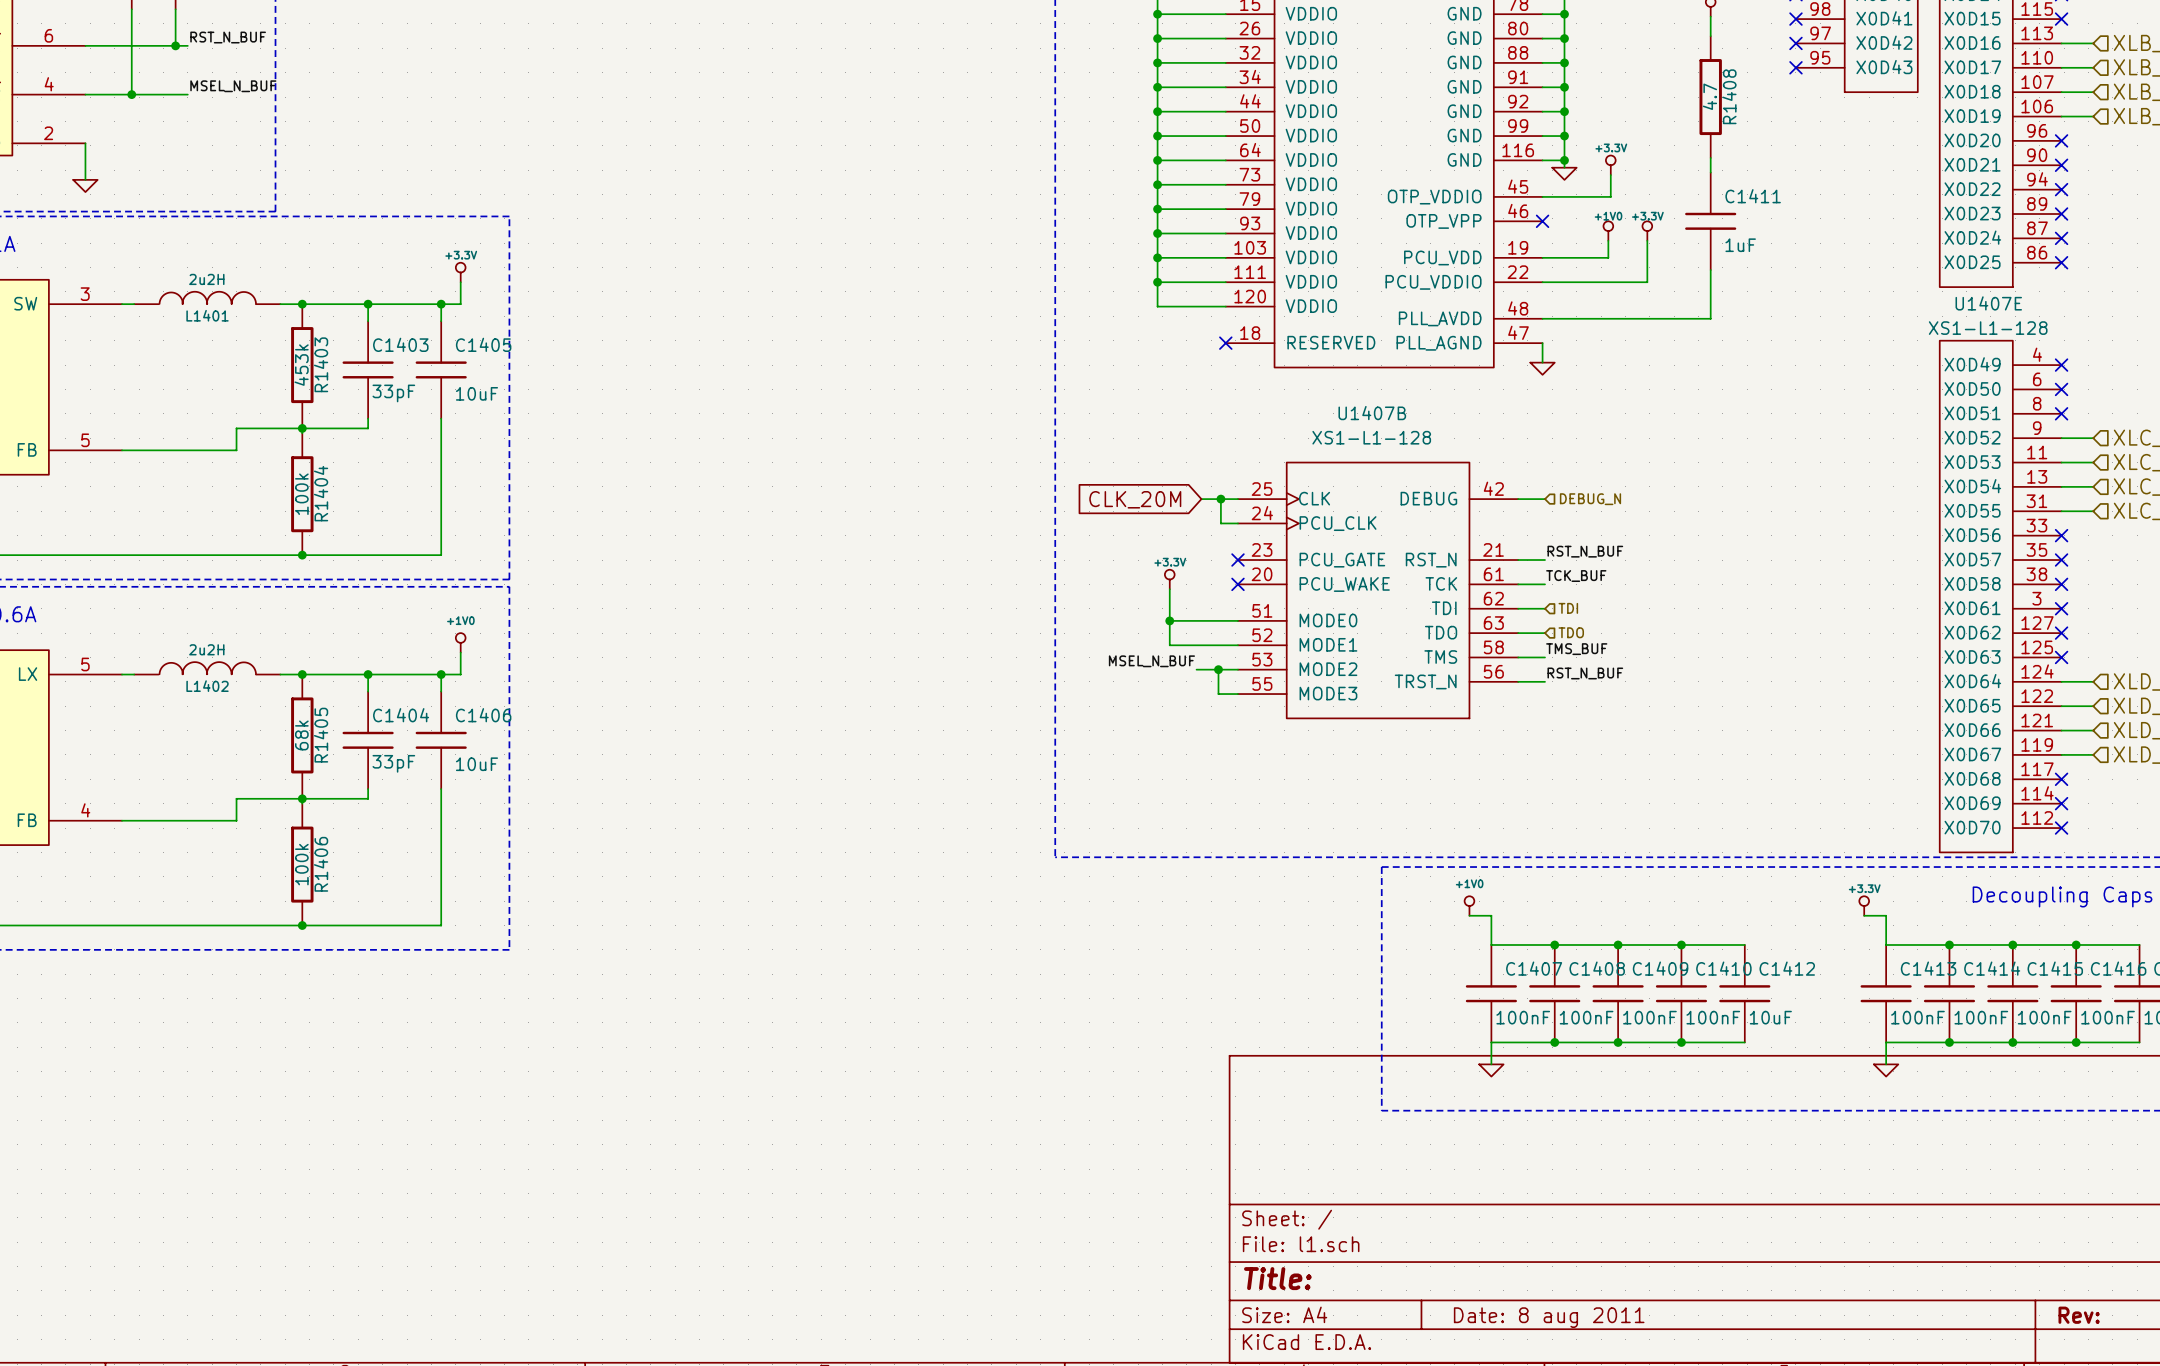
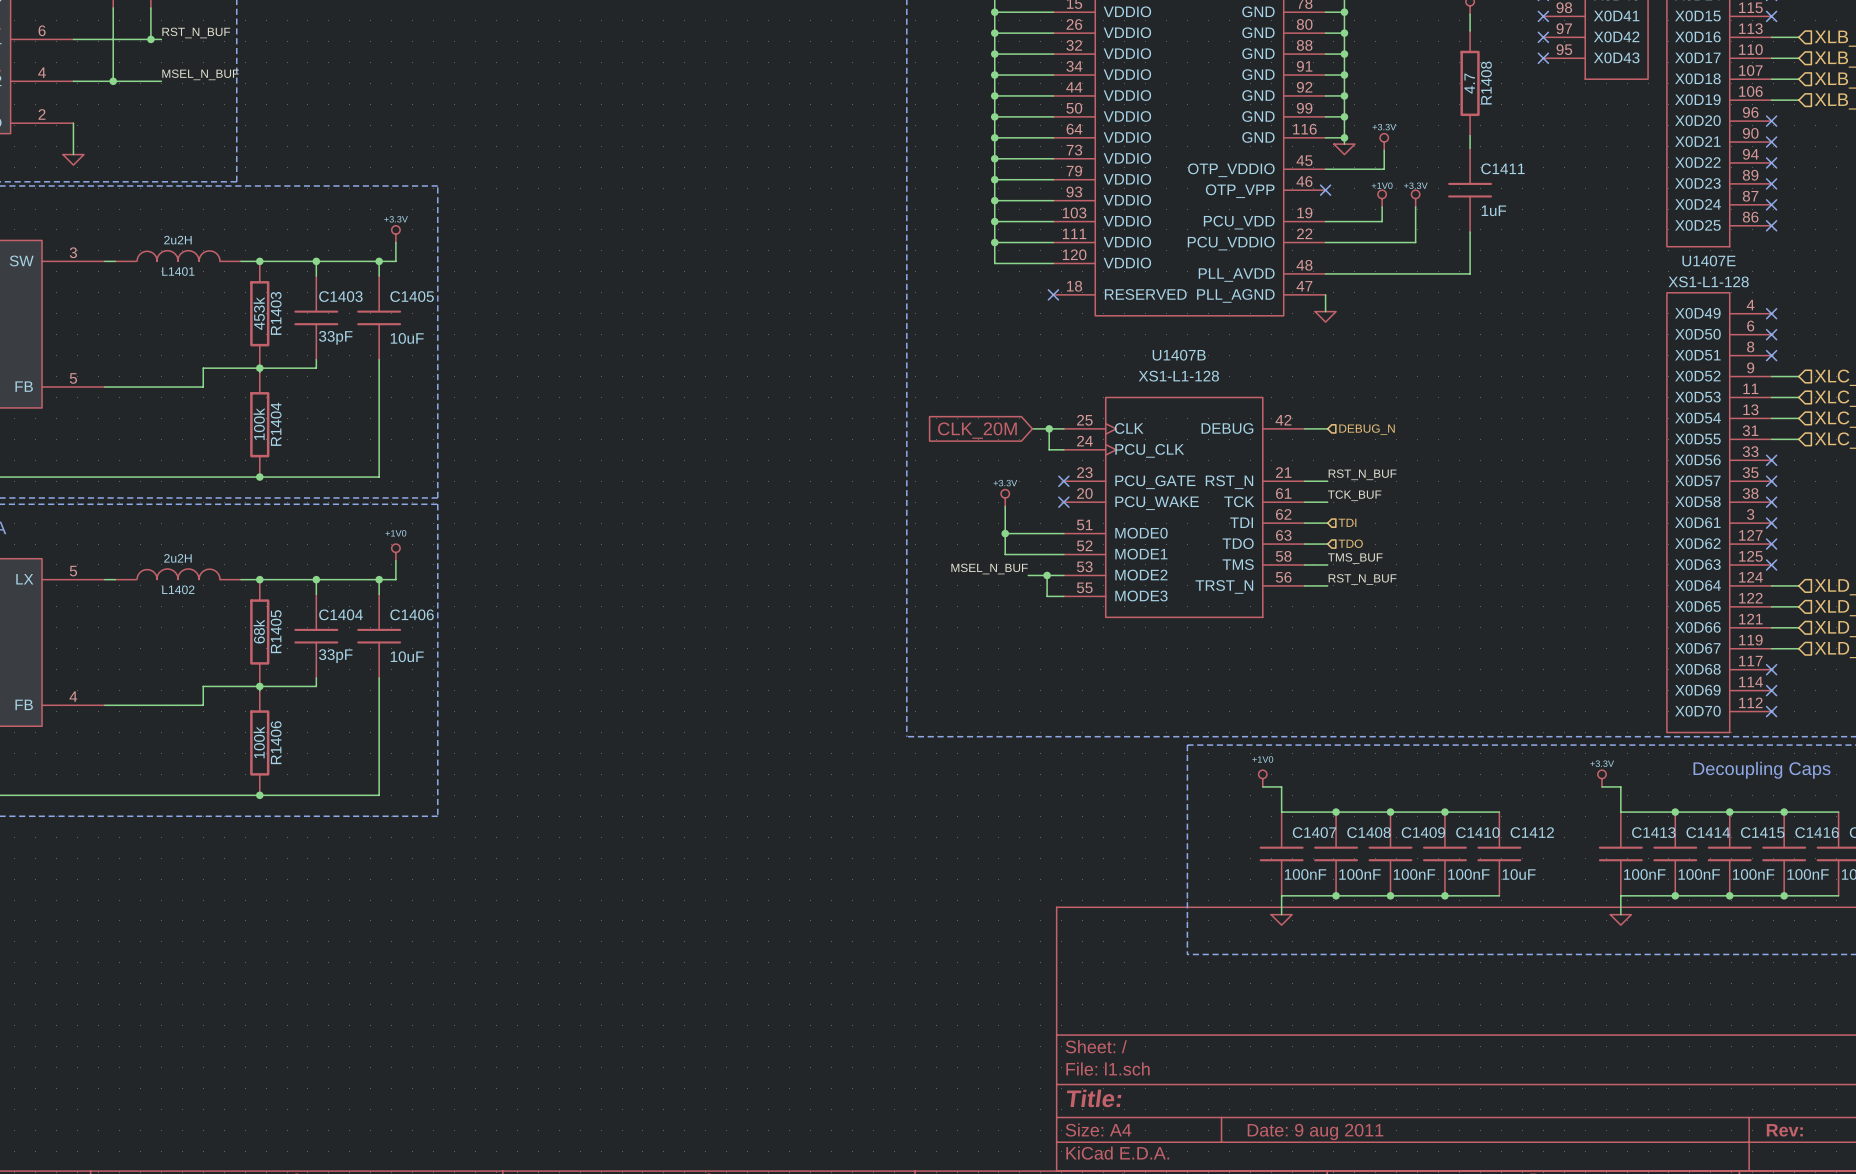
title block: Date: 8 aug 2011 (1549, 1317) -> Date: 9 aug 2011 (1315, 1132)

